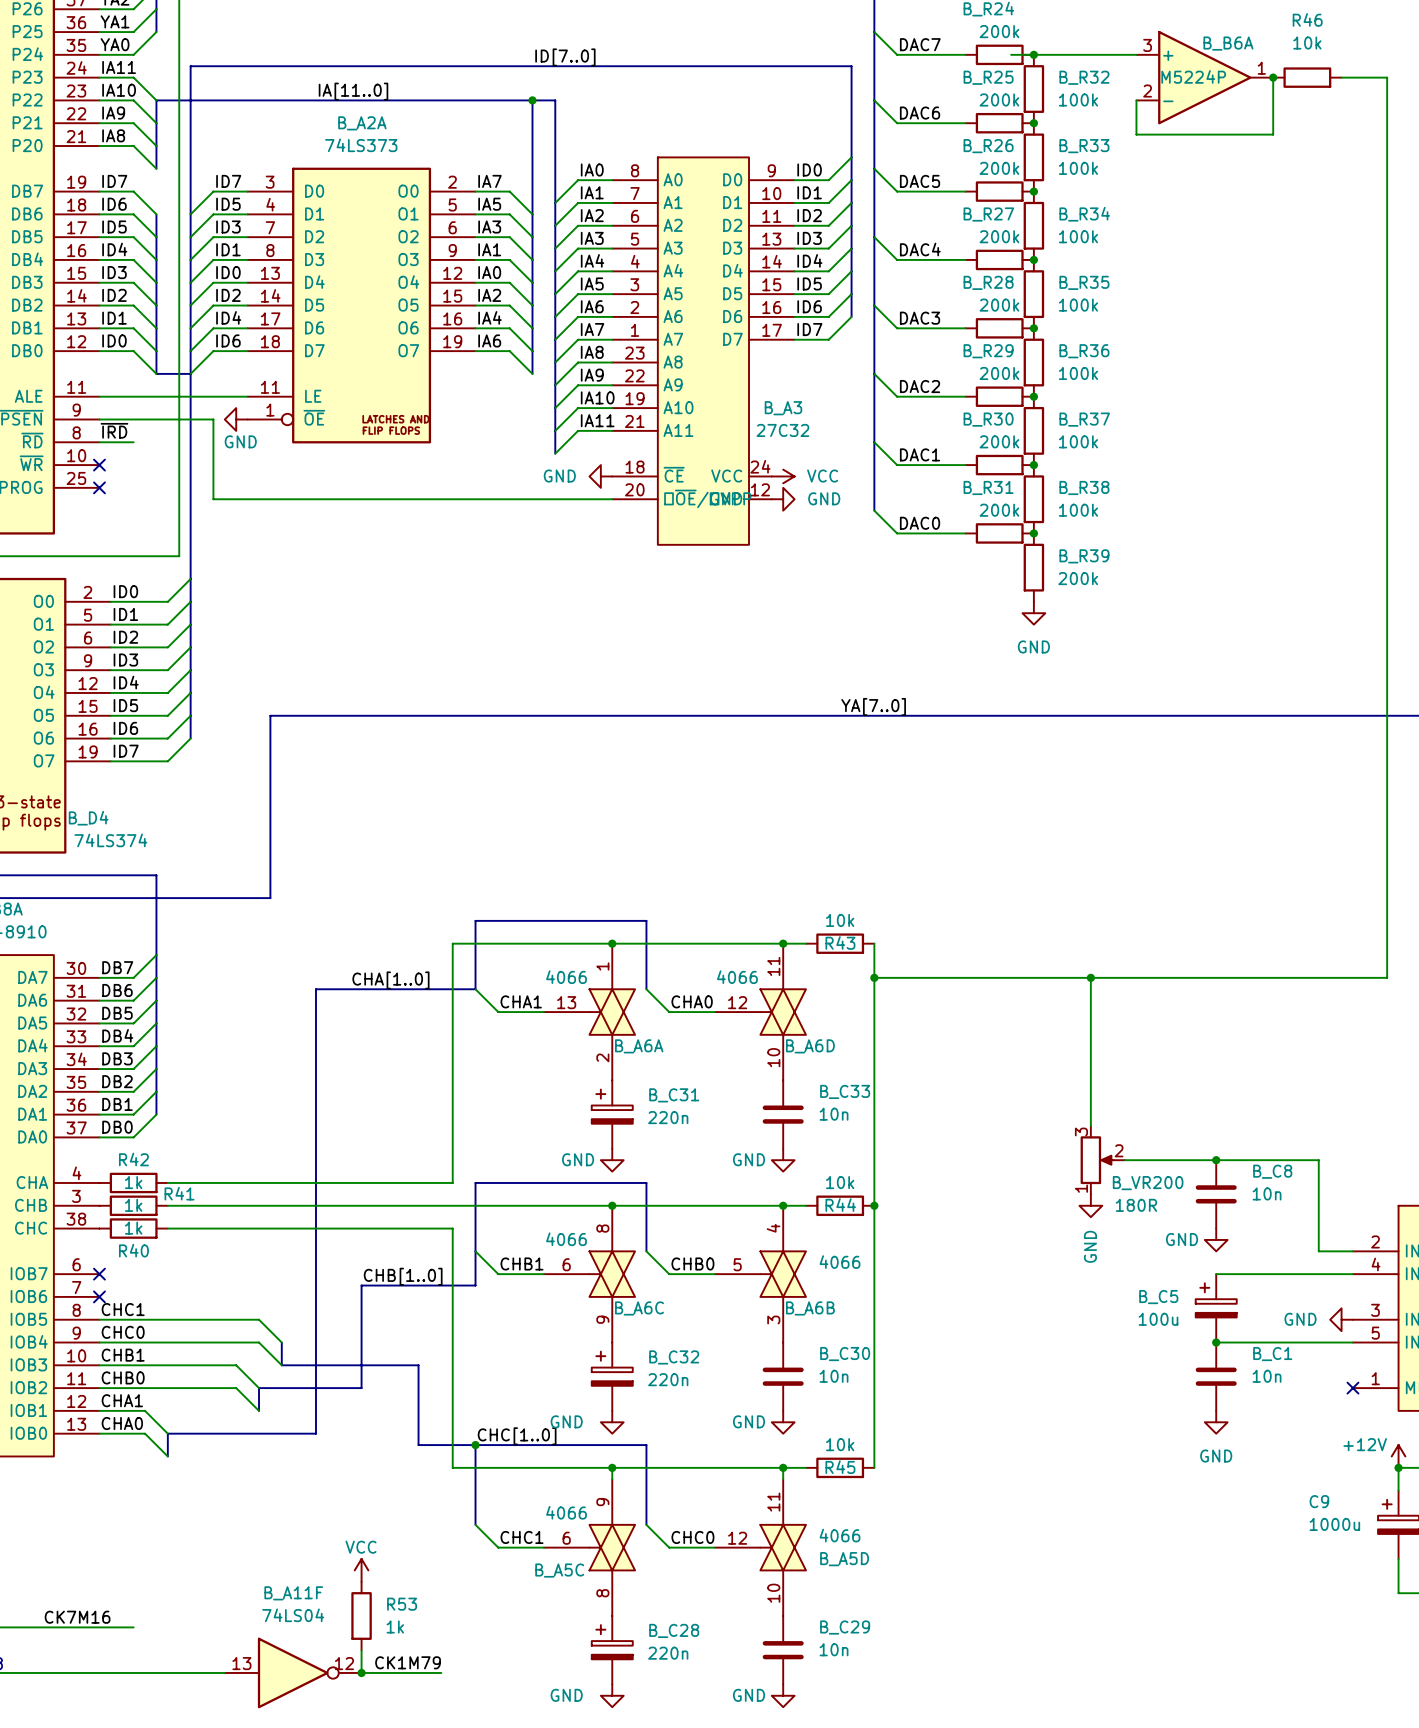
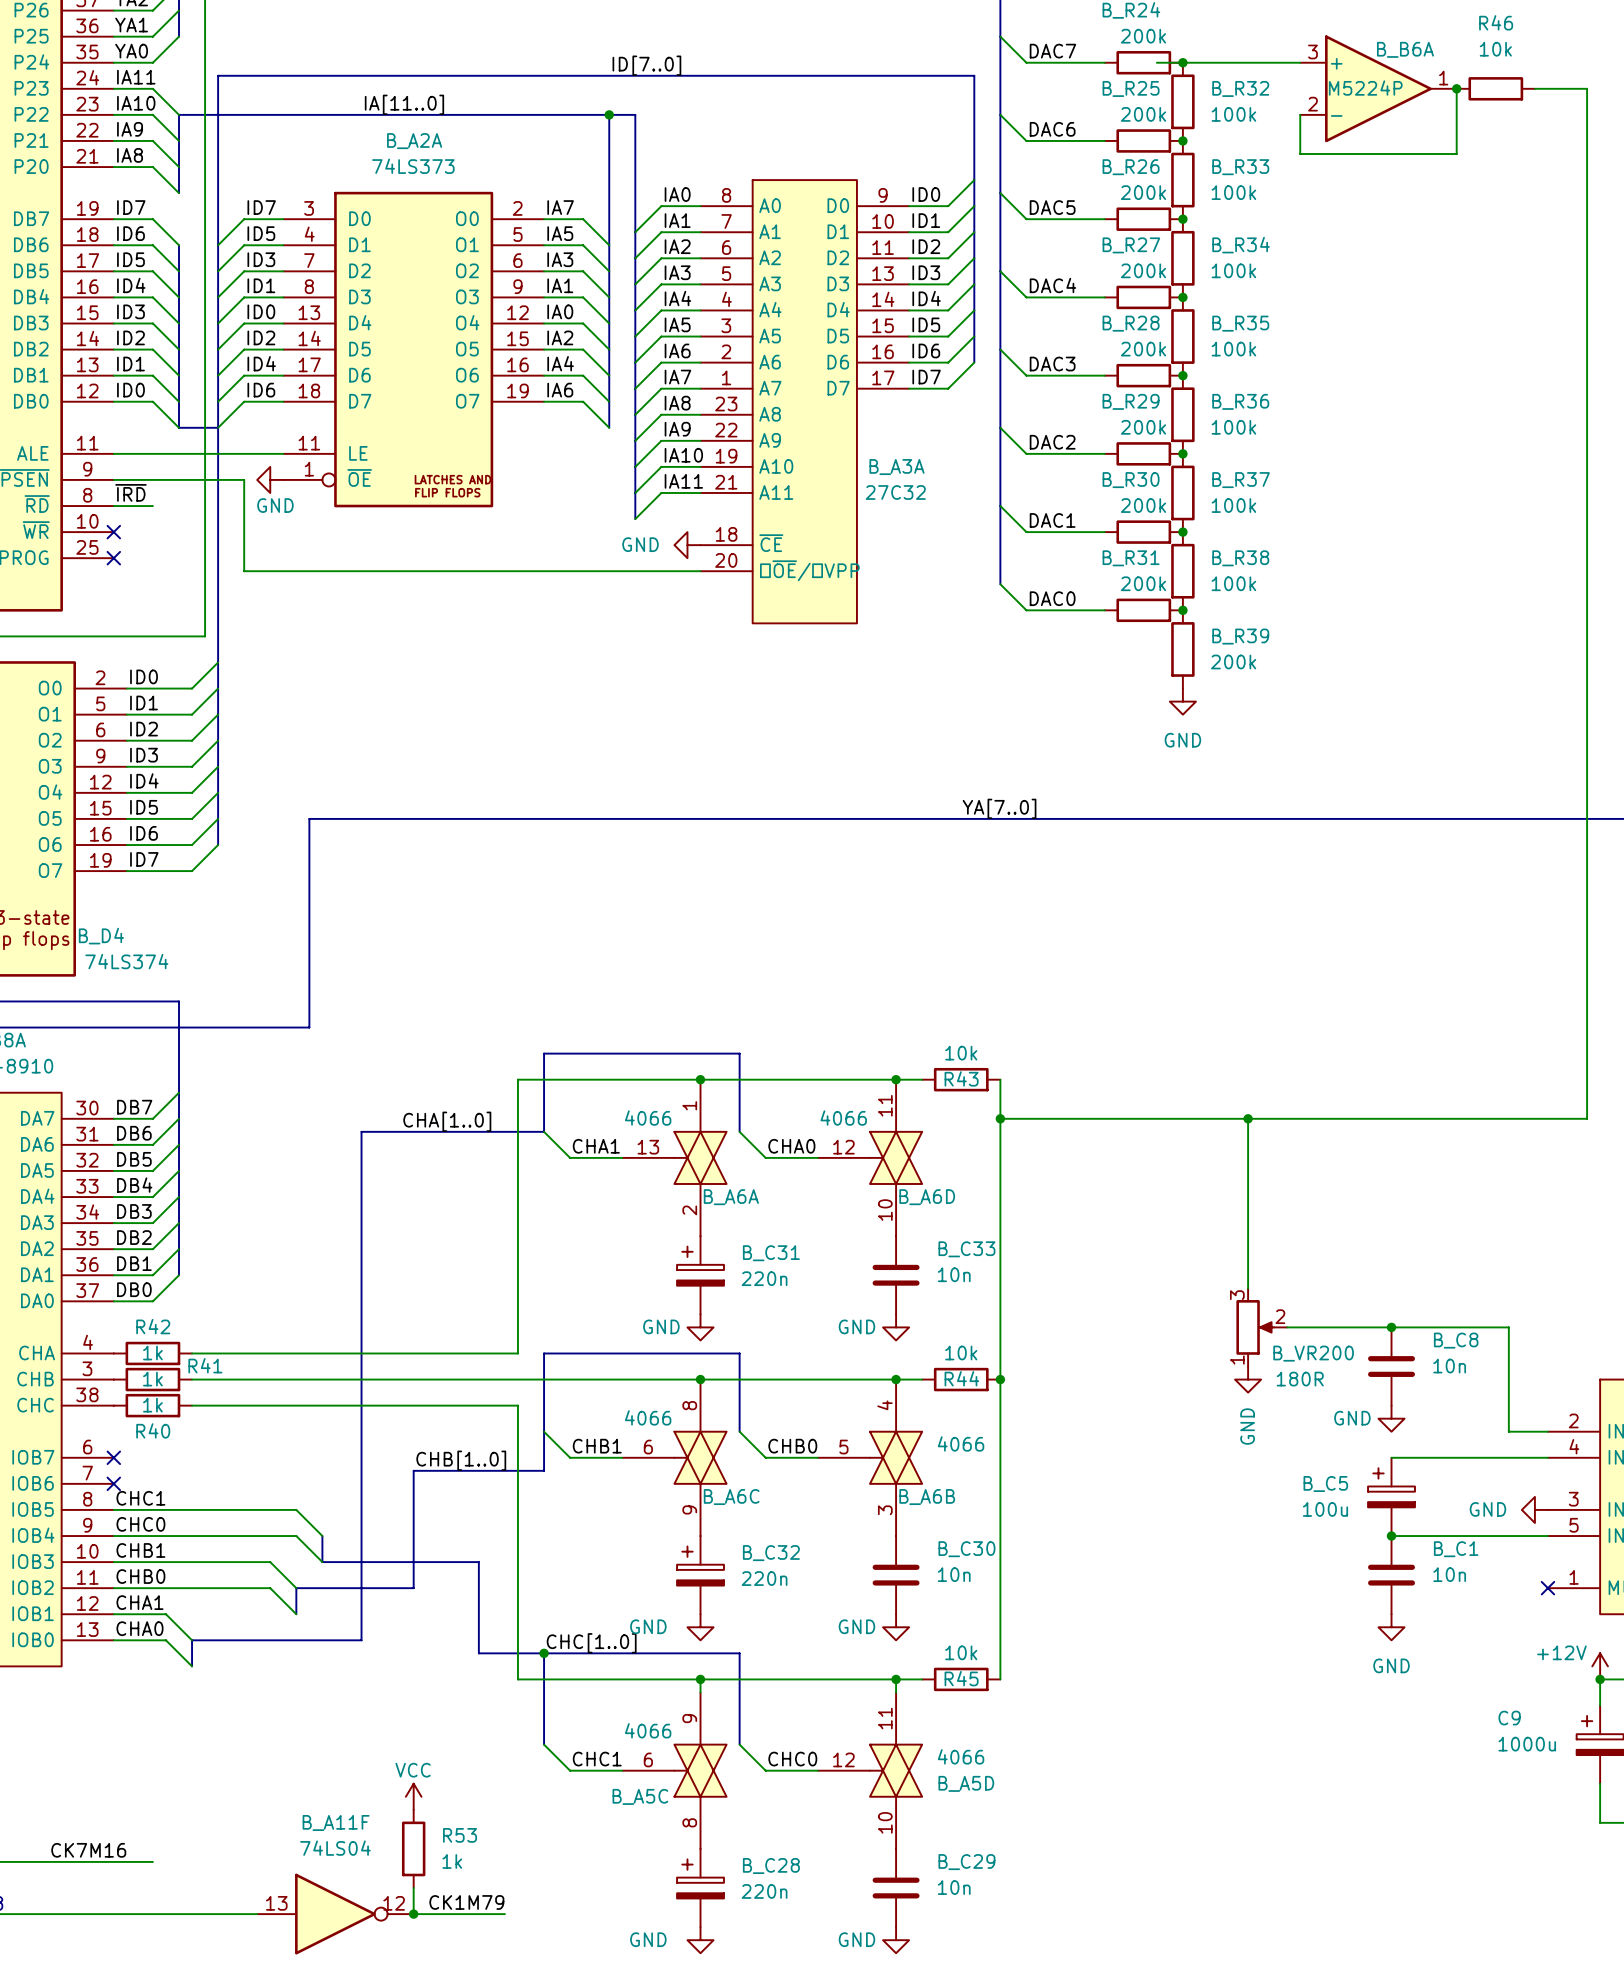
B_A3: 27C32 (703, 351) -> none
B_A3A: none -> 27C32 (804, 401)
power symbol: VCC (783, 476) -> none
power symbol: GND (783, 499) -> none

